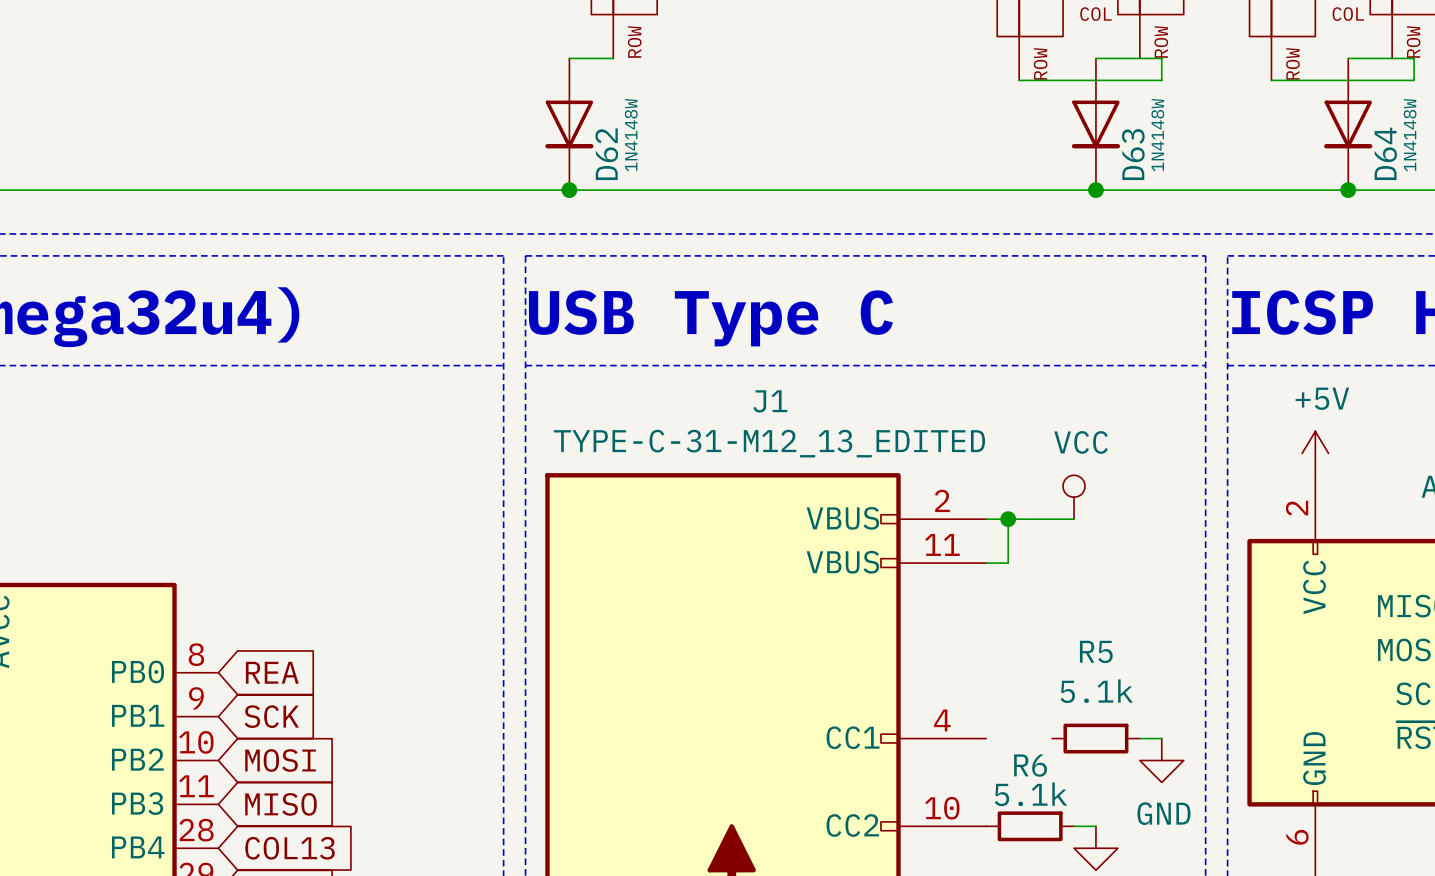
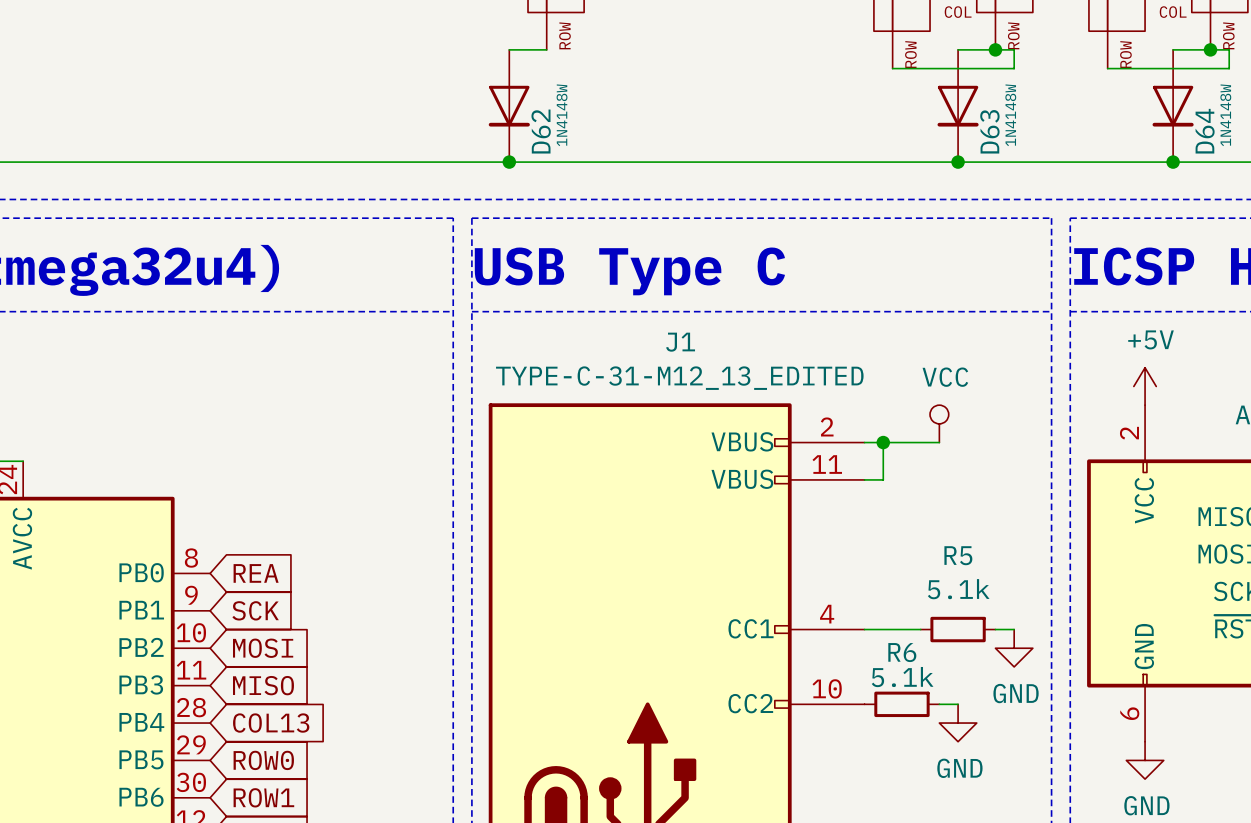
junction: none -> (995, 49)
junction: none -> (1210, 49)
wire: none -> (864, 629) (920, 629)

